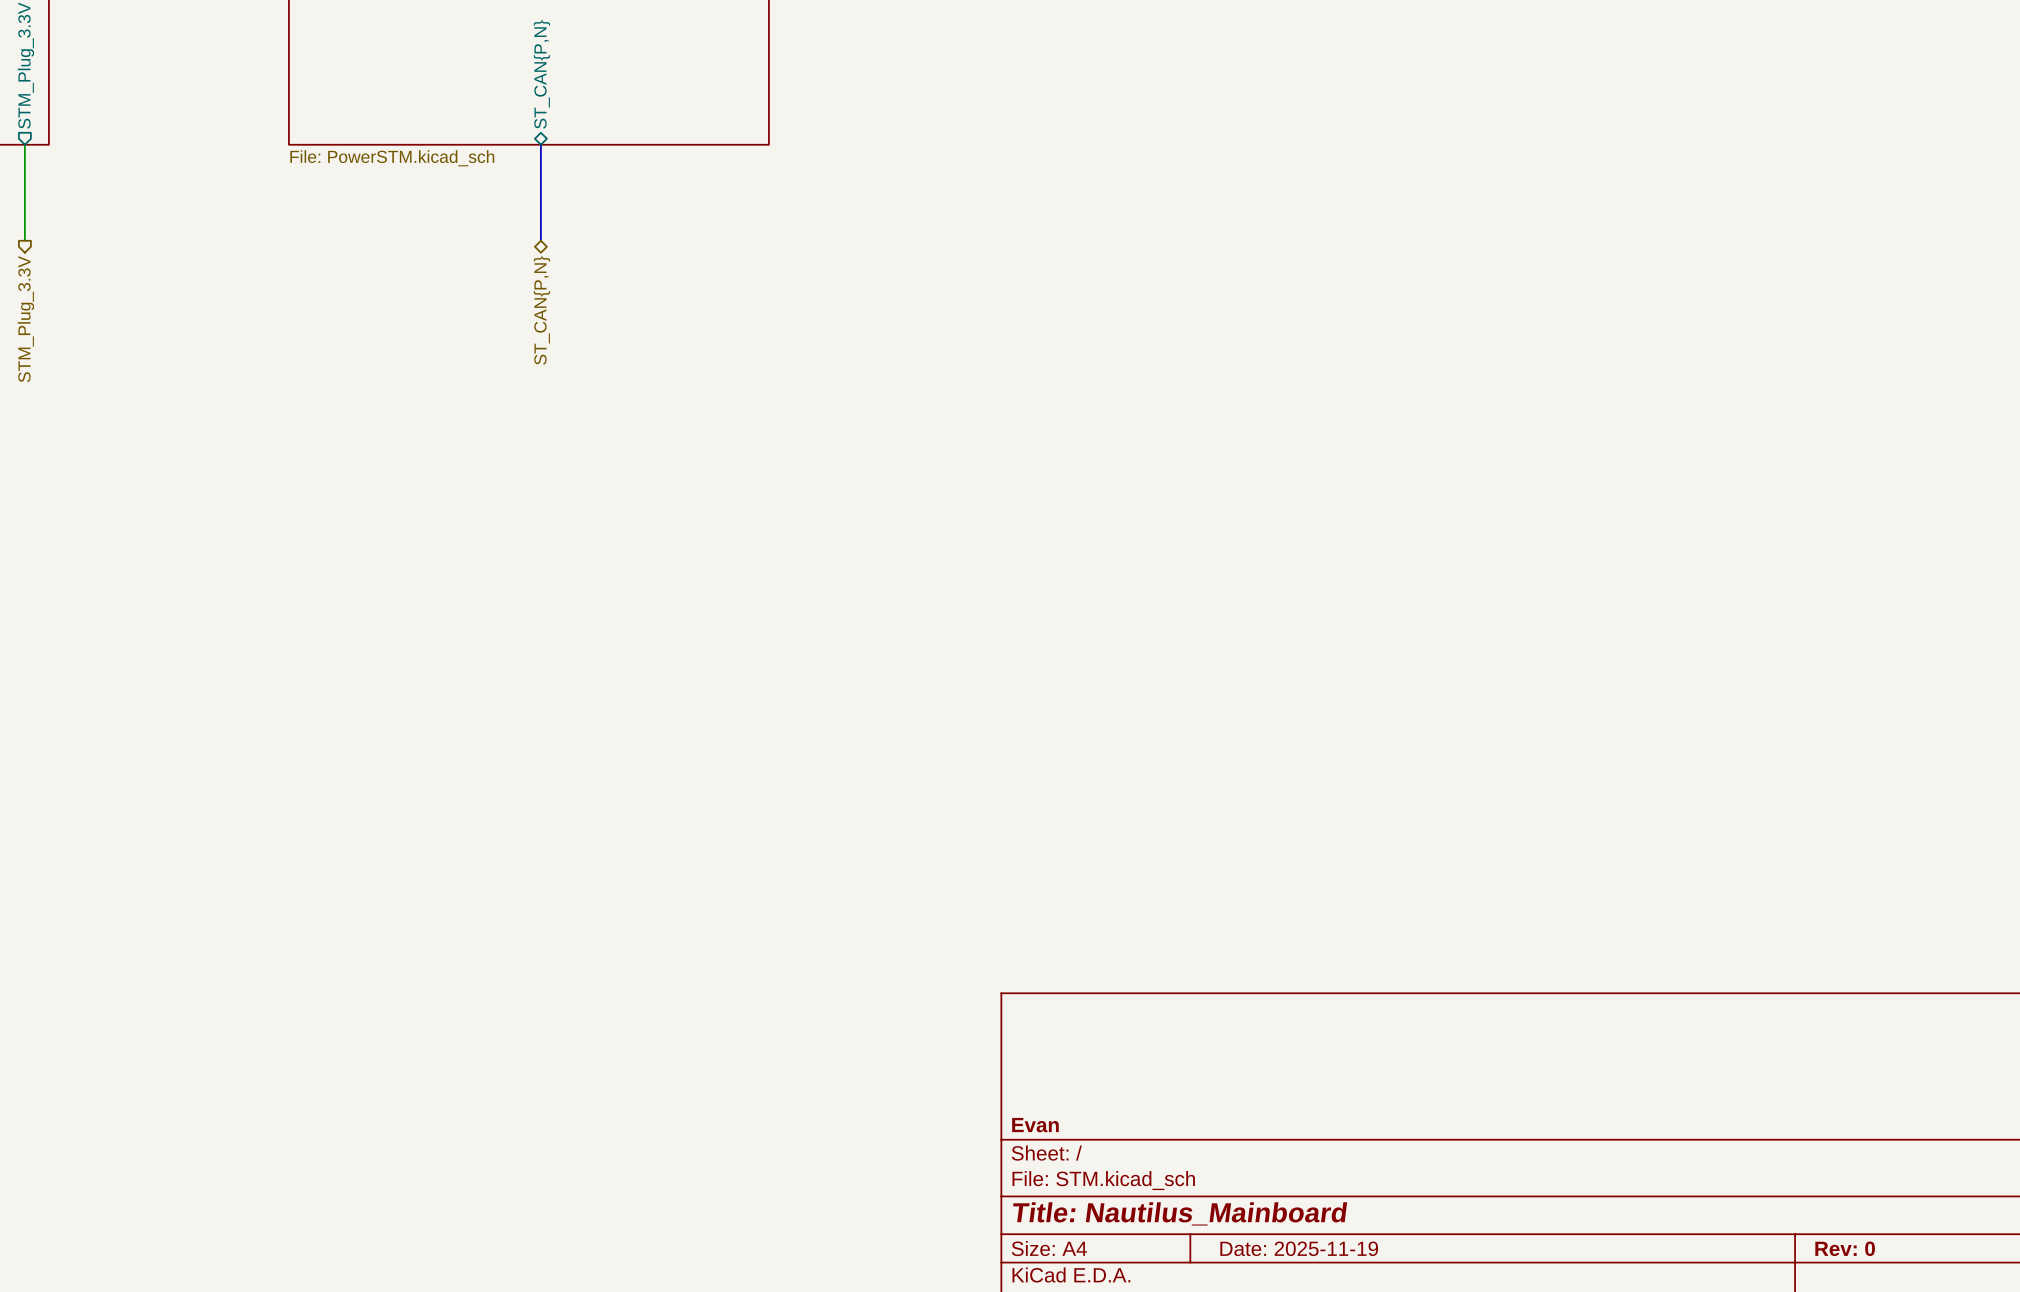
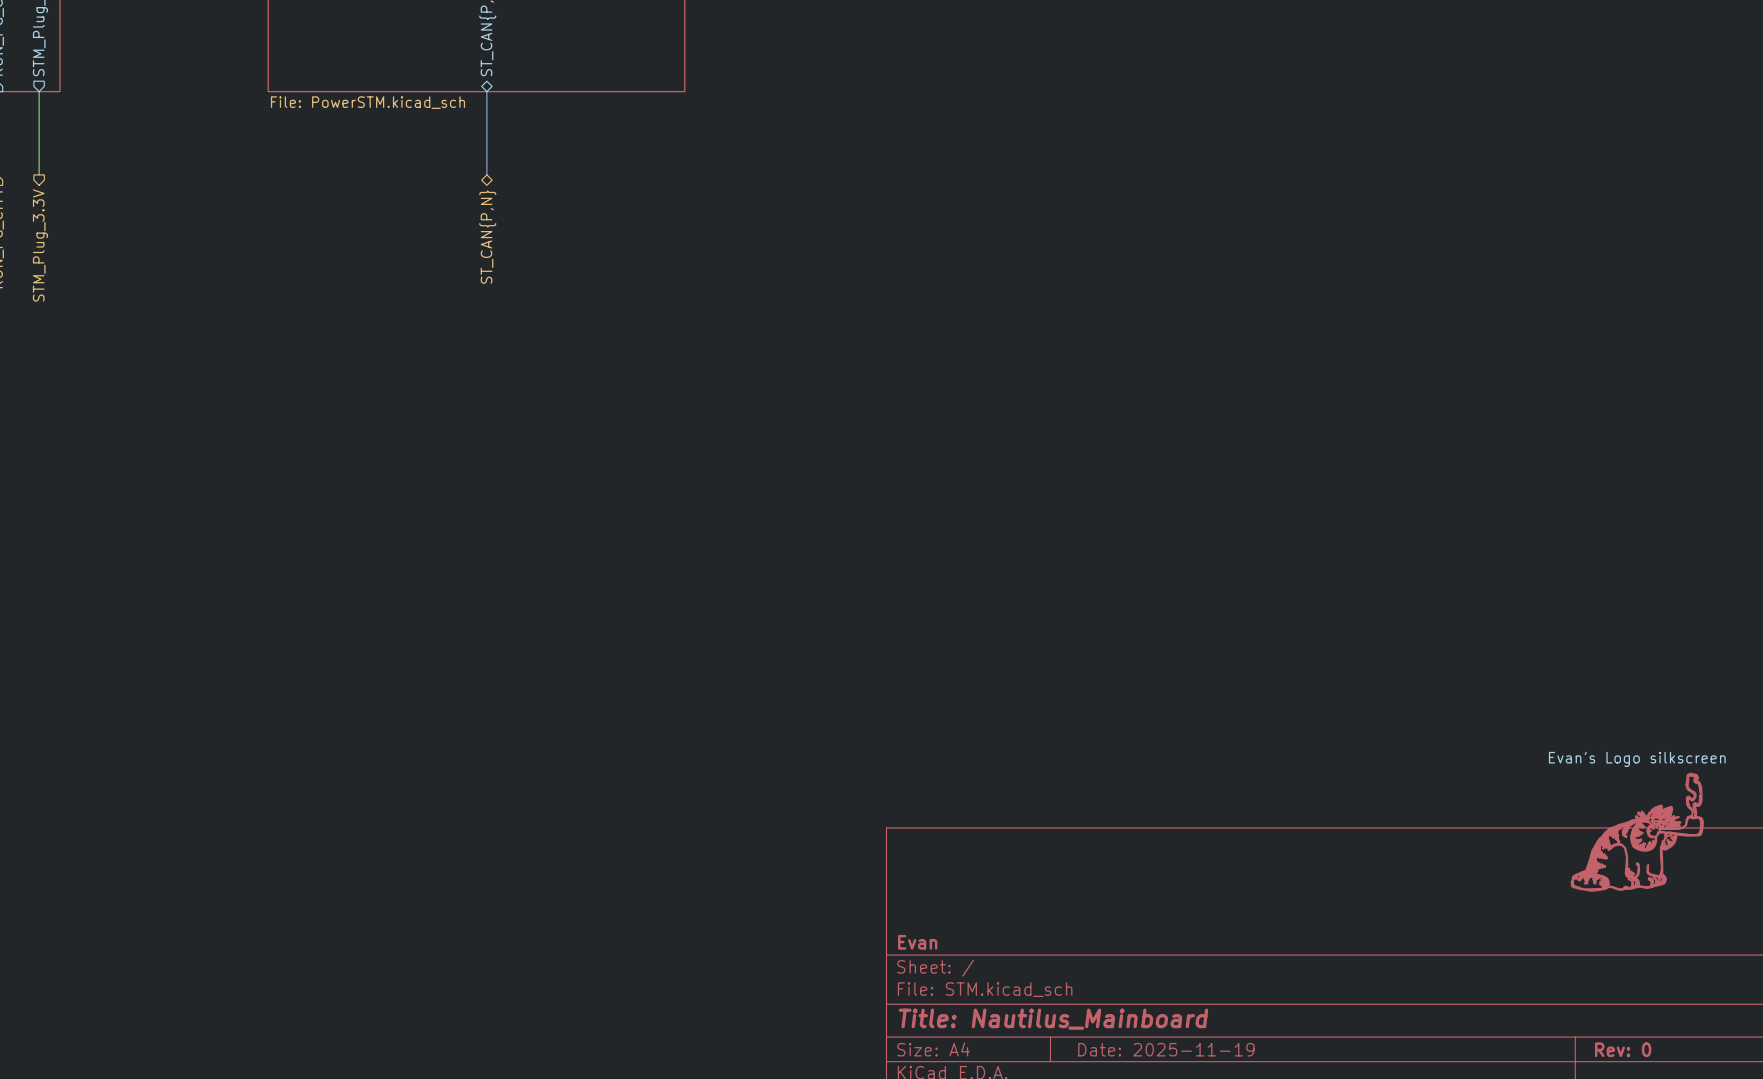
power symbol: none -> Evan's Logo silkscreen (1637, 832)

